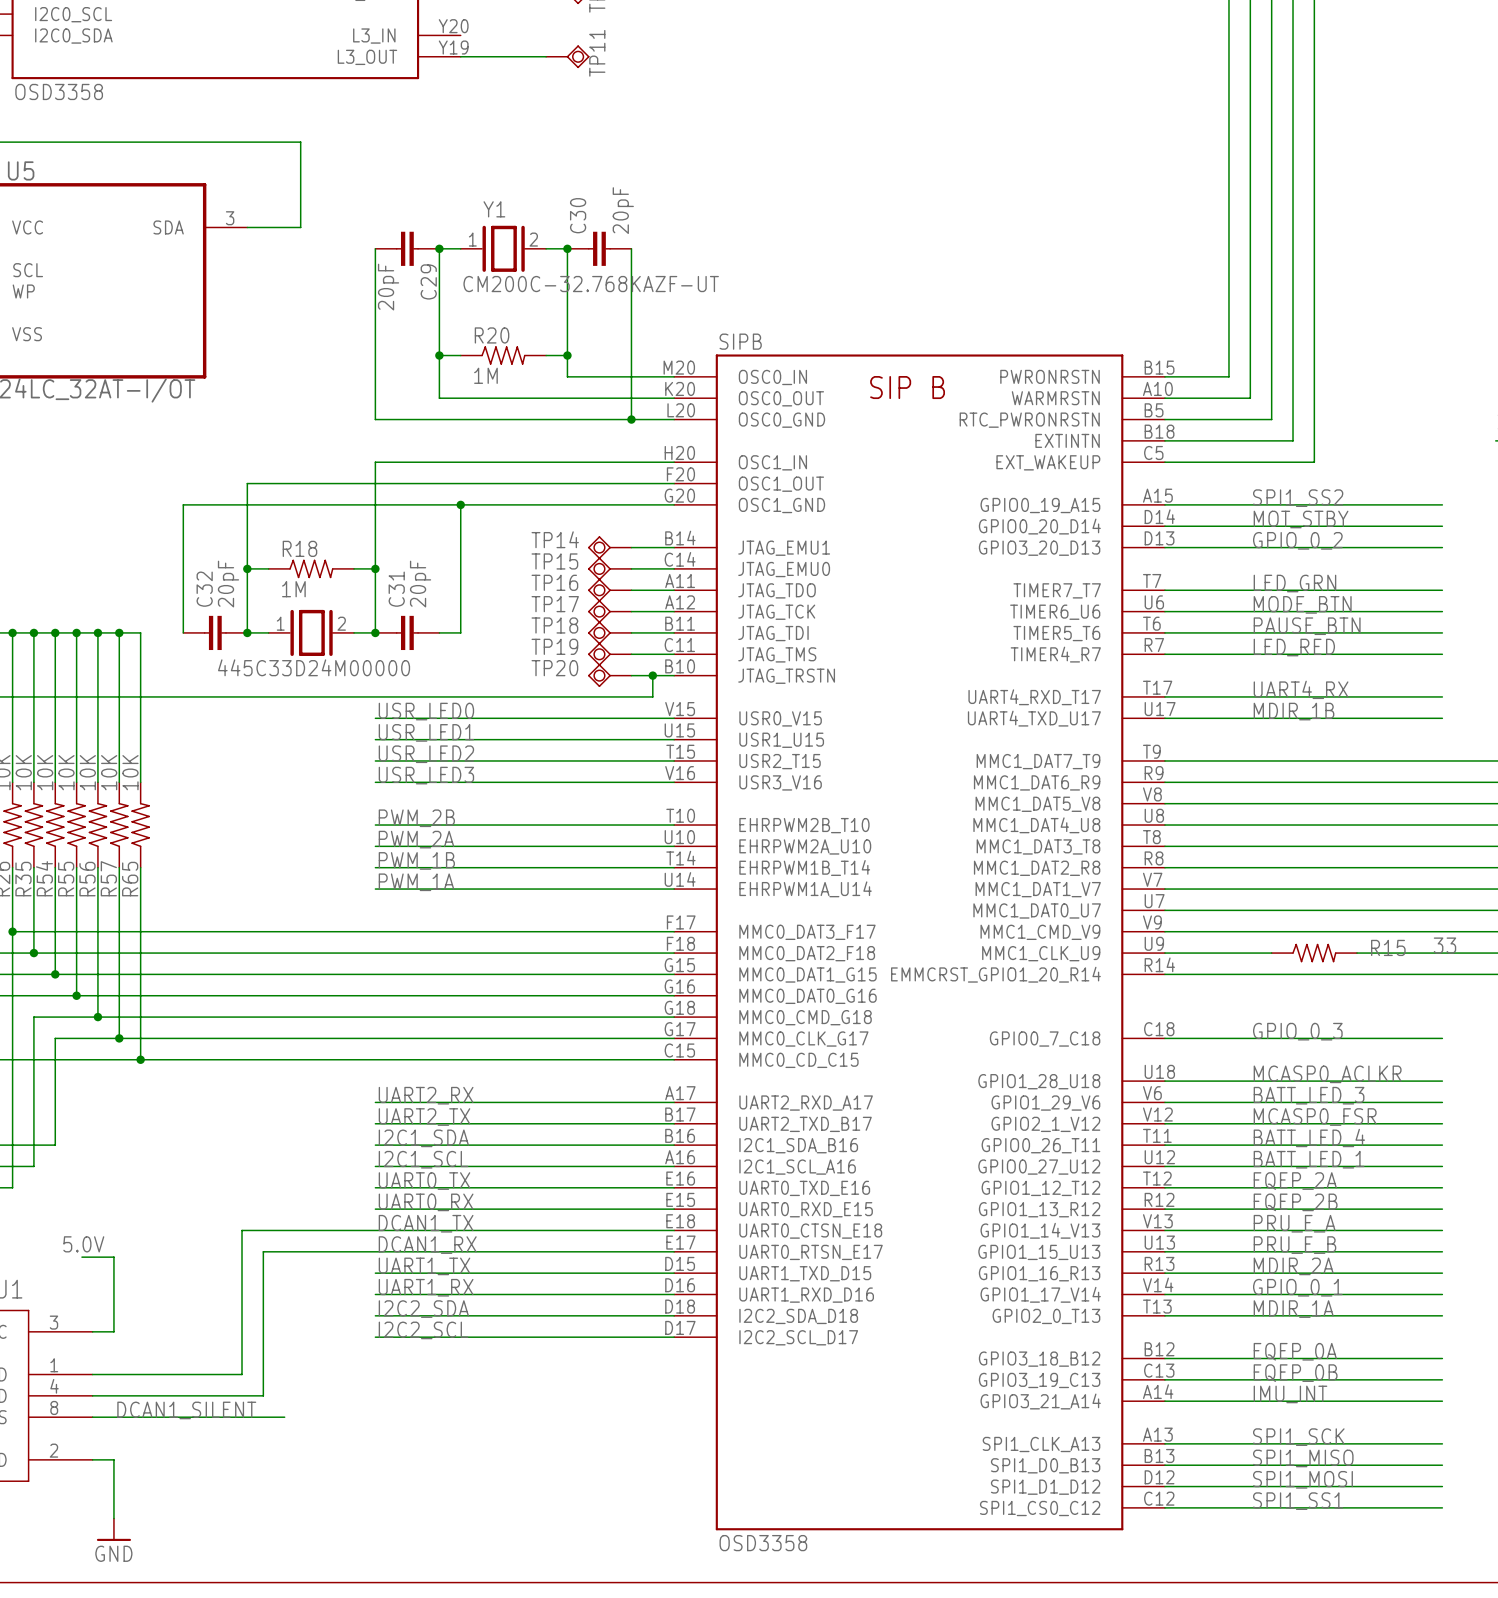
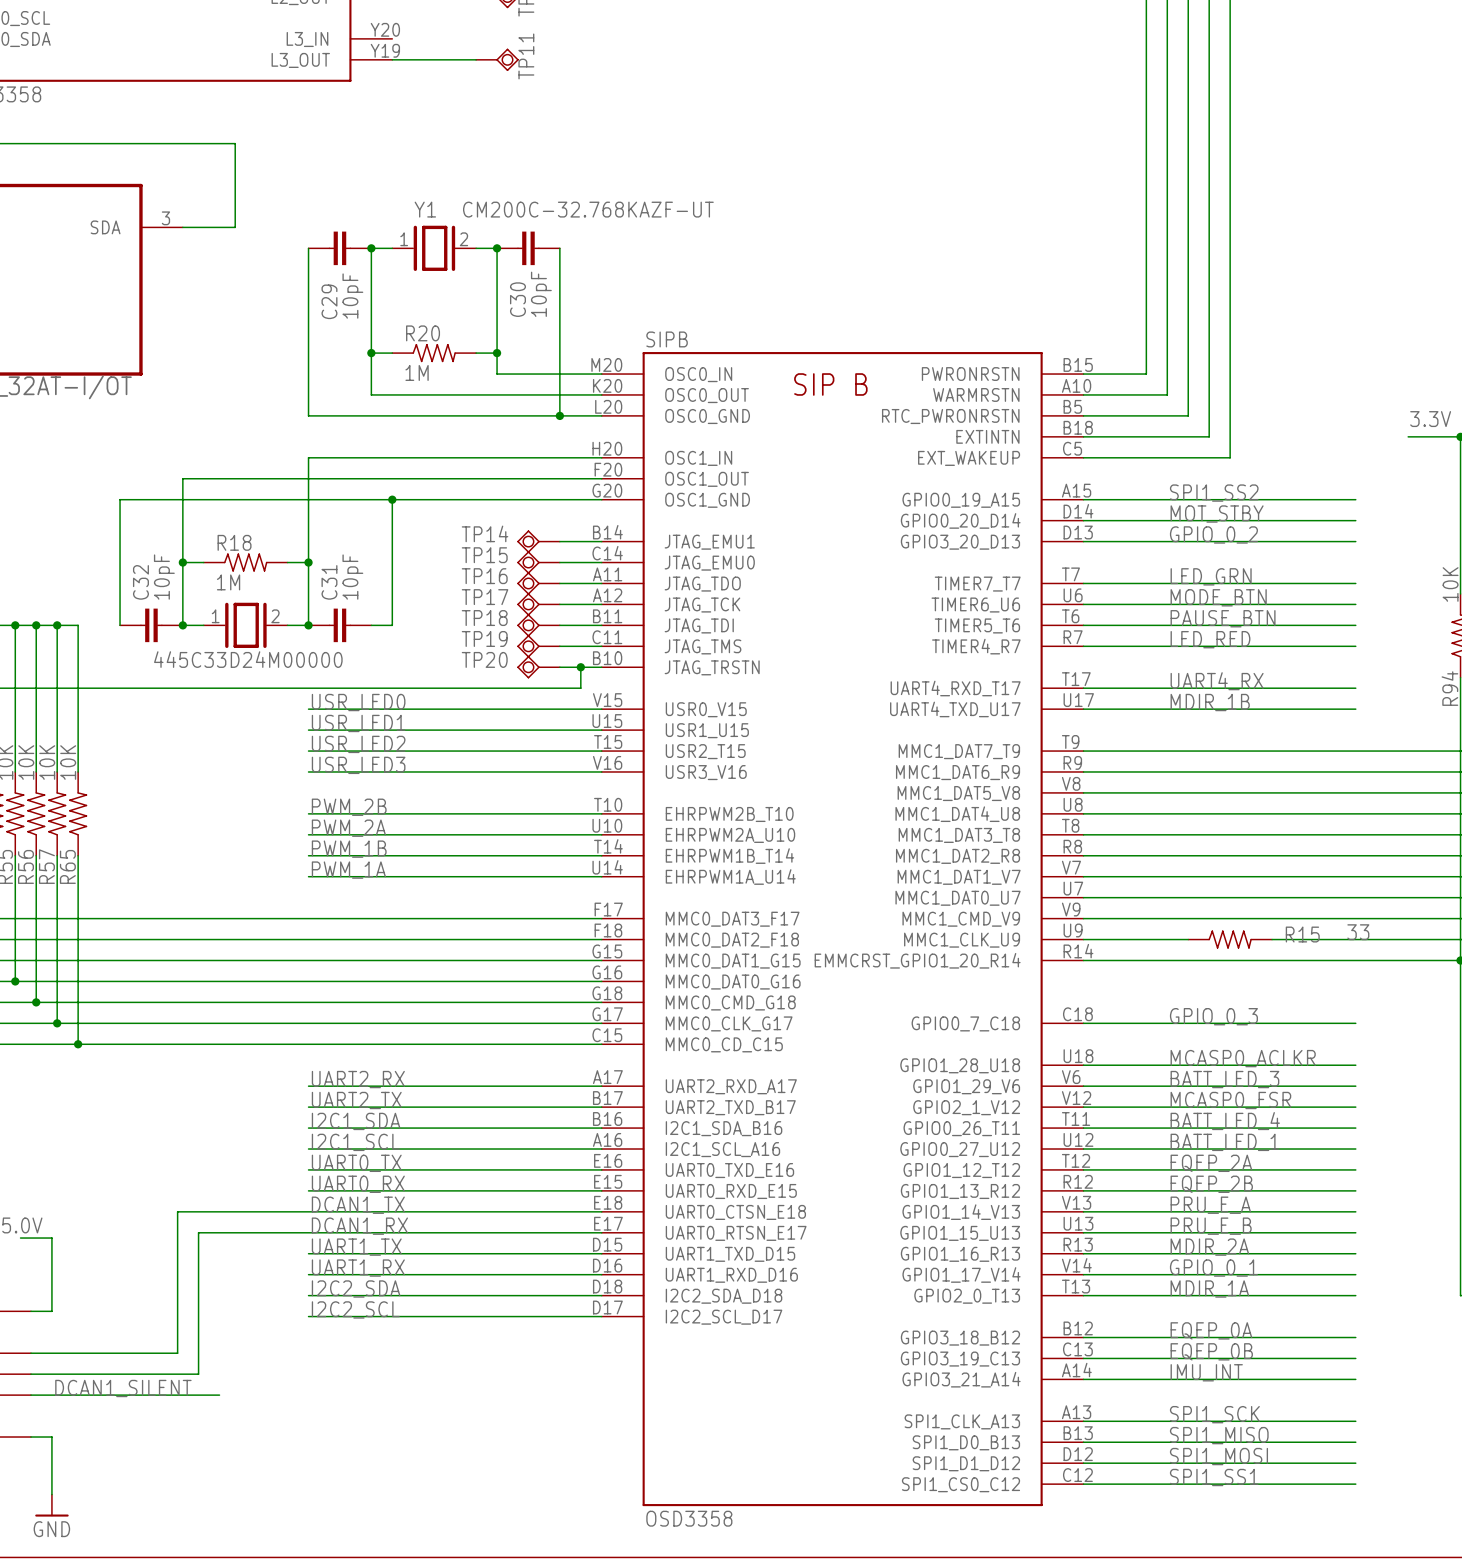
C30 value: 20pF (623, 210) -> 10pF (541, 294)
C30 name position: C30 (578, 215) -> C30 (517, 299)
C29 name position: C29 (428, 281) -> C29 (329, 301)
part value position: CM200C-32.768KAZF-UT (591, 284) -> CM200C-32.768KAZF-UT (588, 209)
C29 value: 20pF (388, 287) -> 10pF (352, 296)
C32 value: 20pF (228, 584) -> 10pF (164, 577)
C31 value: 20pF (420, 584) -> 10pF (352, 577)

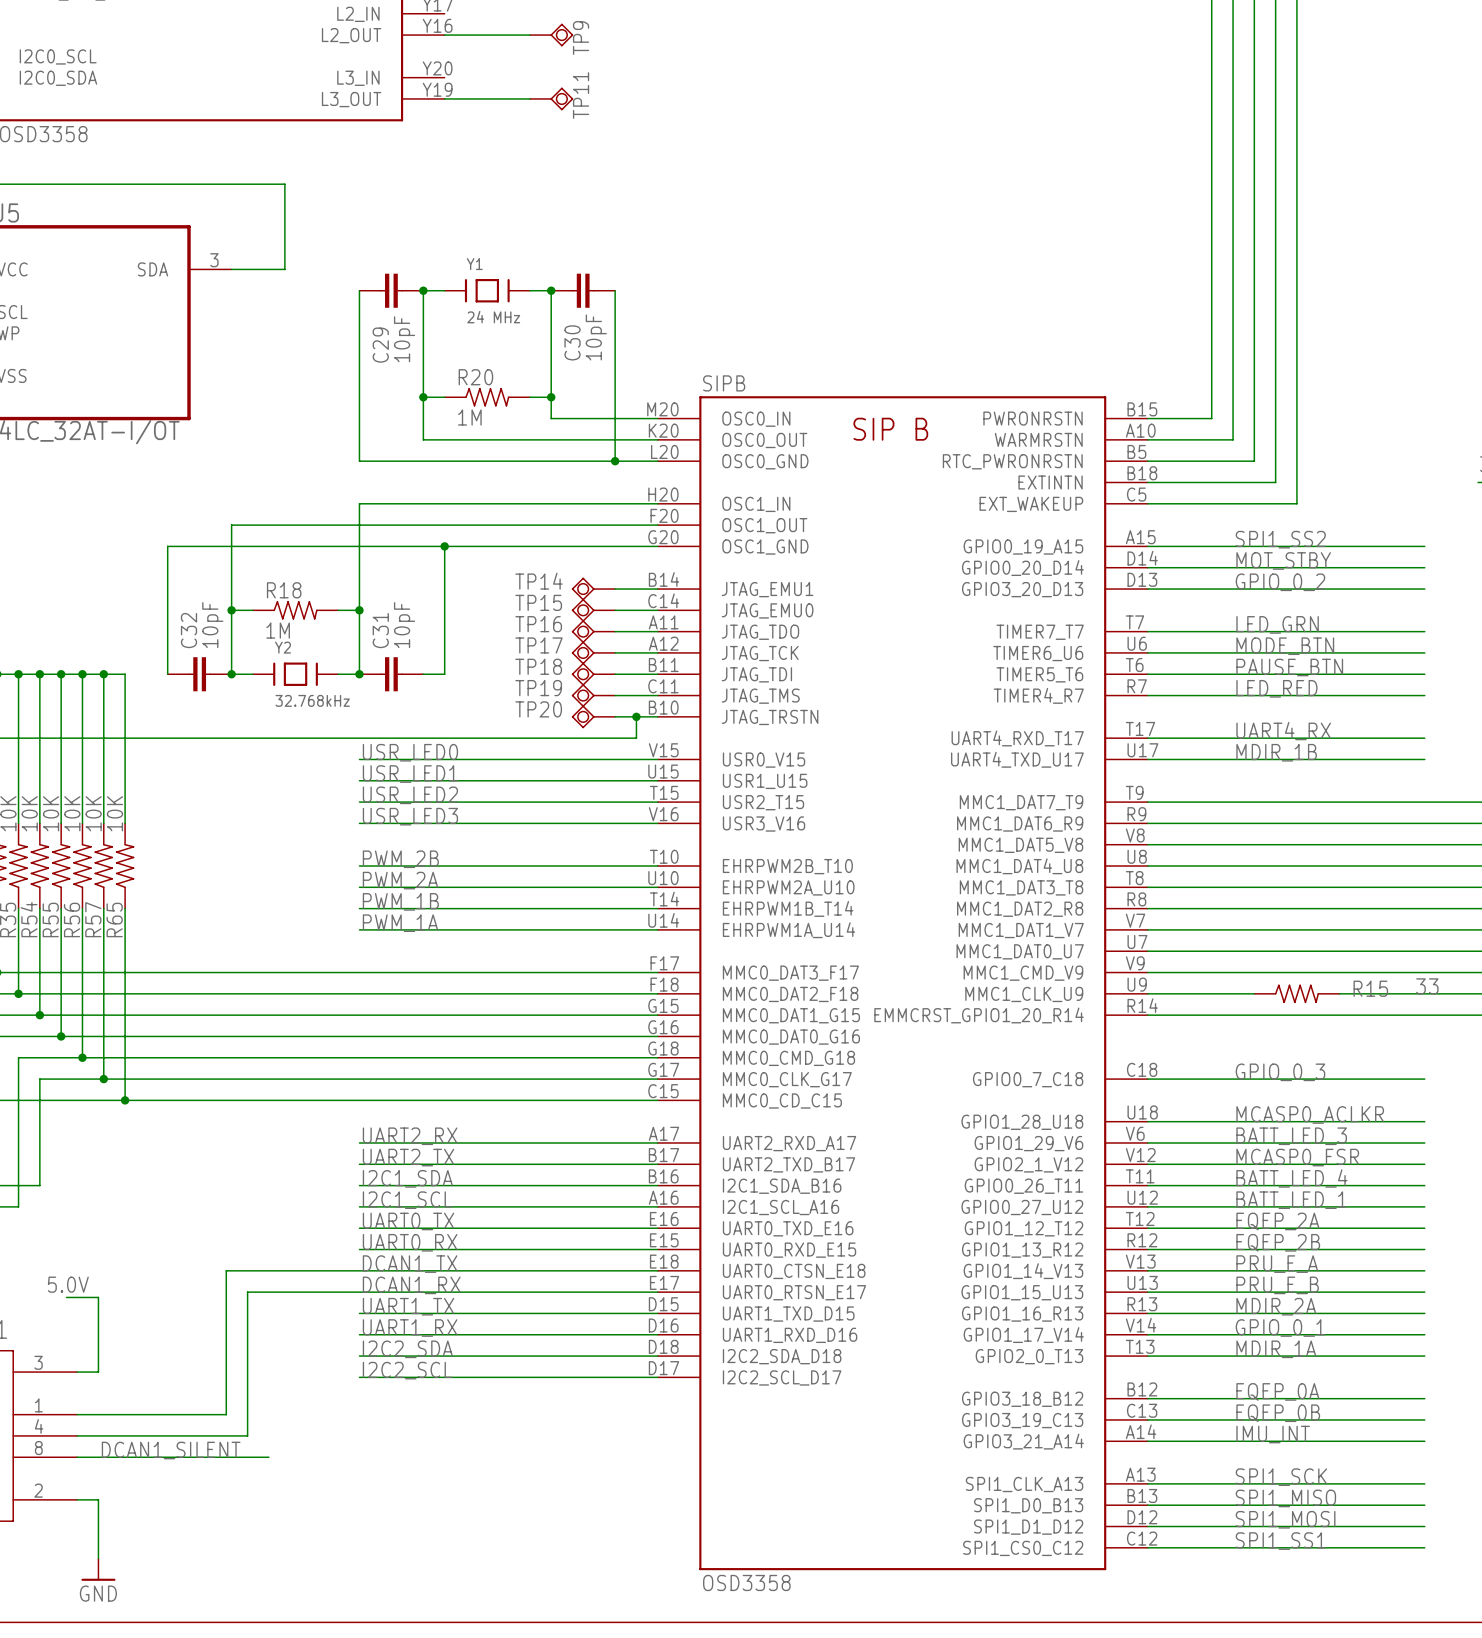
part: CM200C-32.768KAZF-UT (434, 248) -> none
Y1: none -> 24 MHz (487, 290)
part: 445C33D24M00000 (245, 625) -> none
Y2: none -> 32.768kHz (295, 674)

